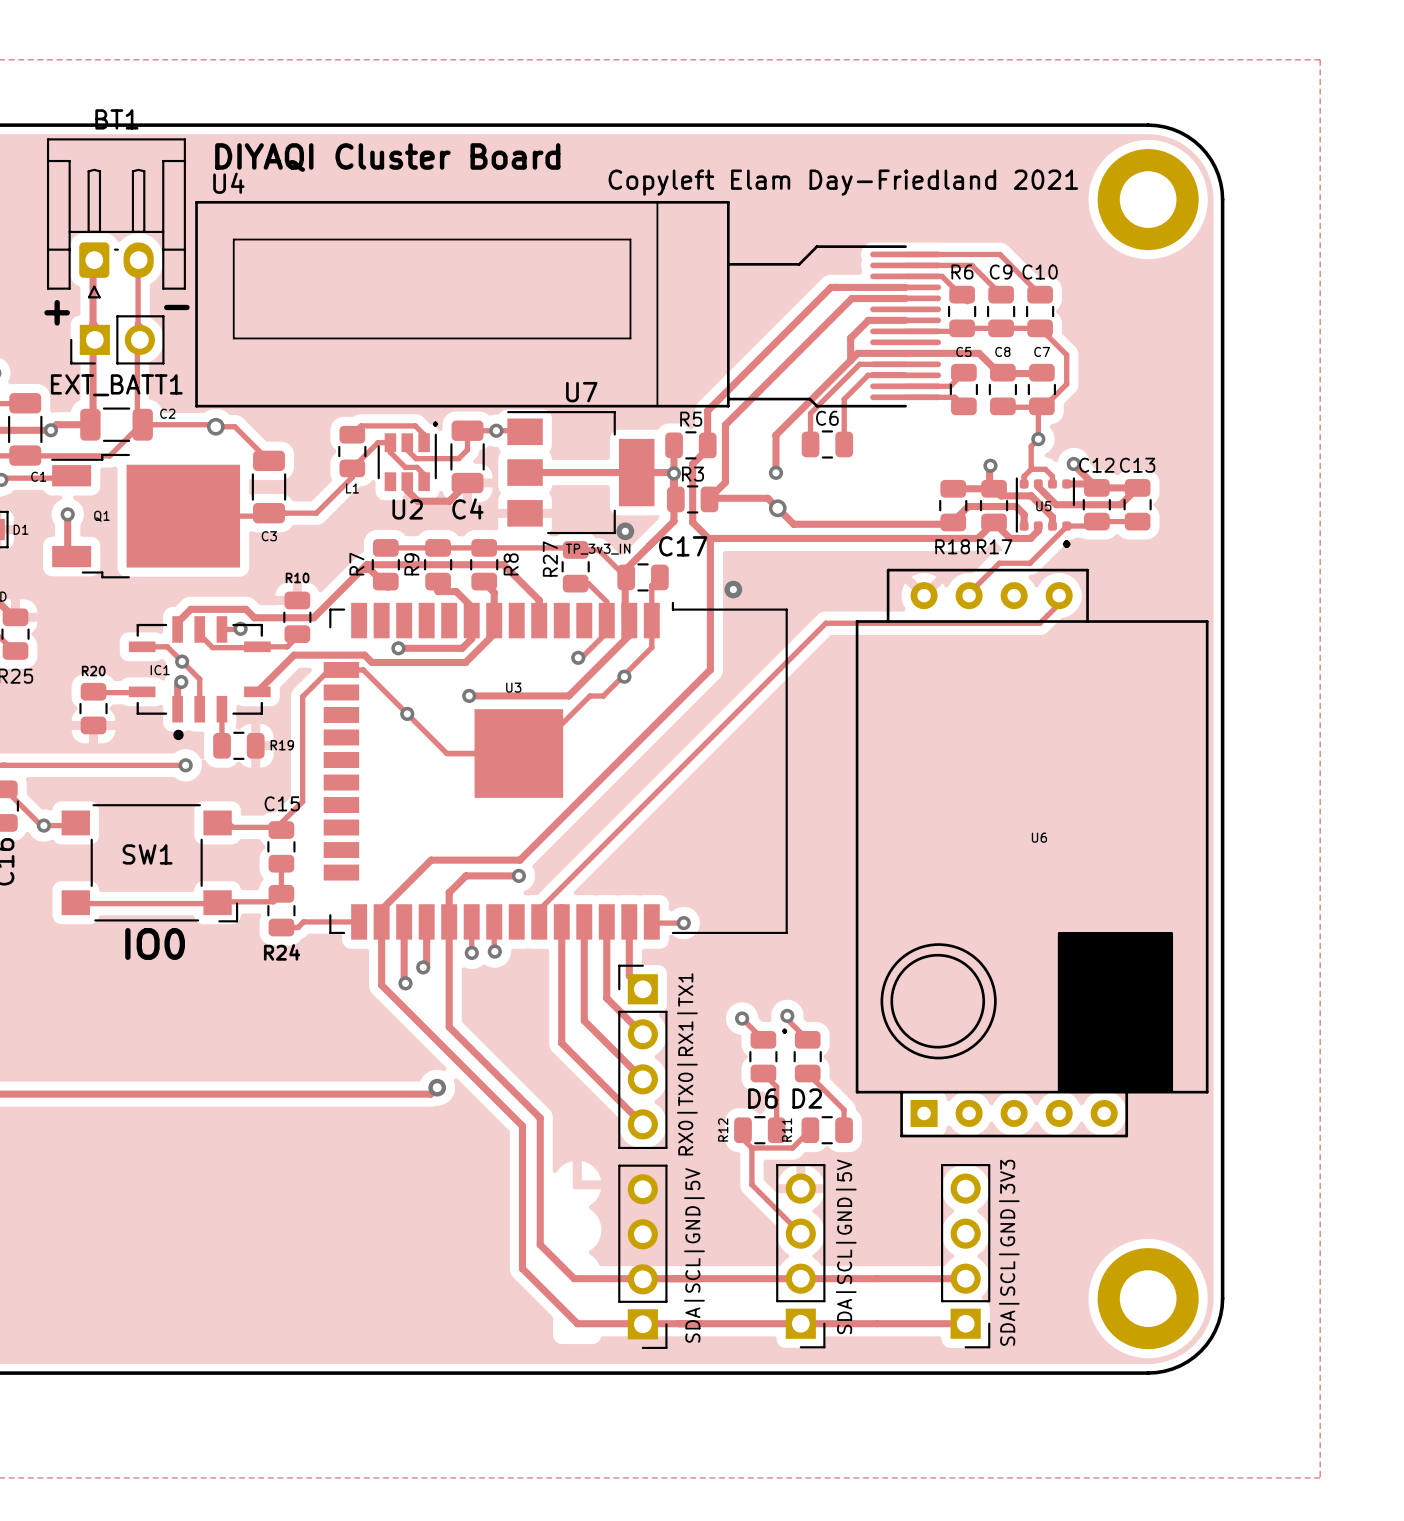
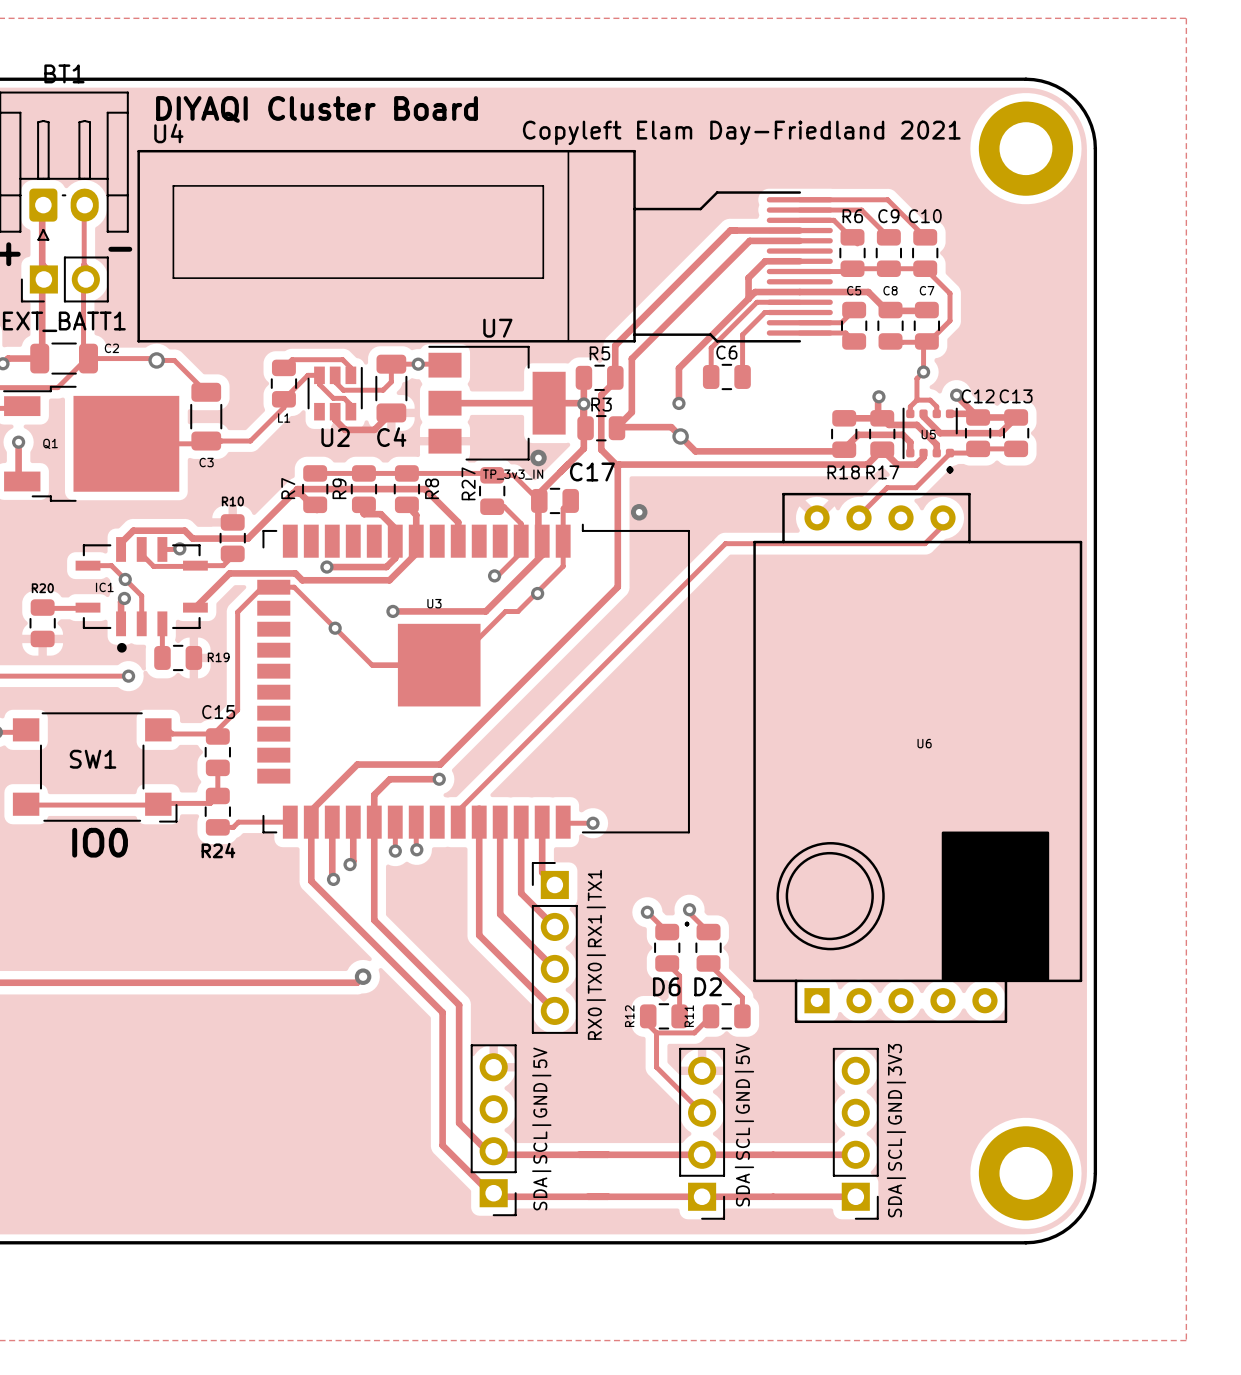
text: . (435, 424) -> none
text position: SDA|SCL|GND|5V (694, 1255) -> SDA|SCL|GND|5V (541, 1128)
part position: (642, 1256) -> (493, 1130)

